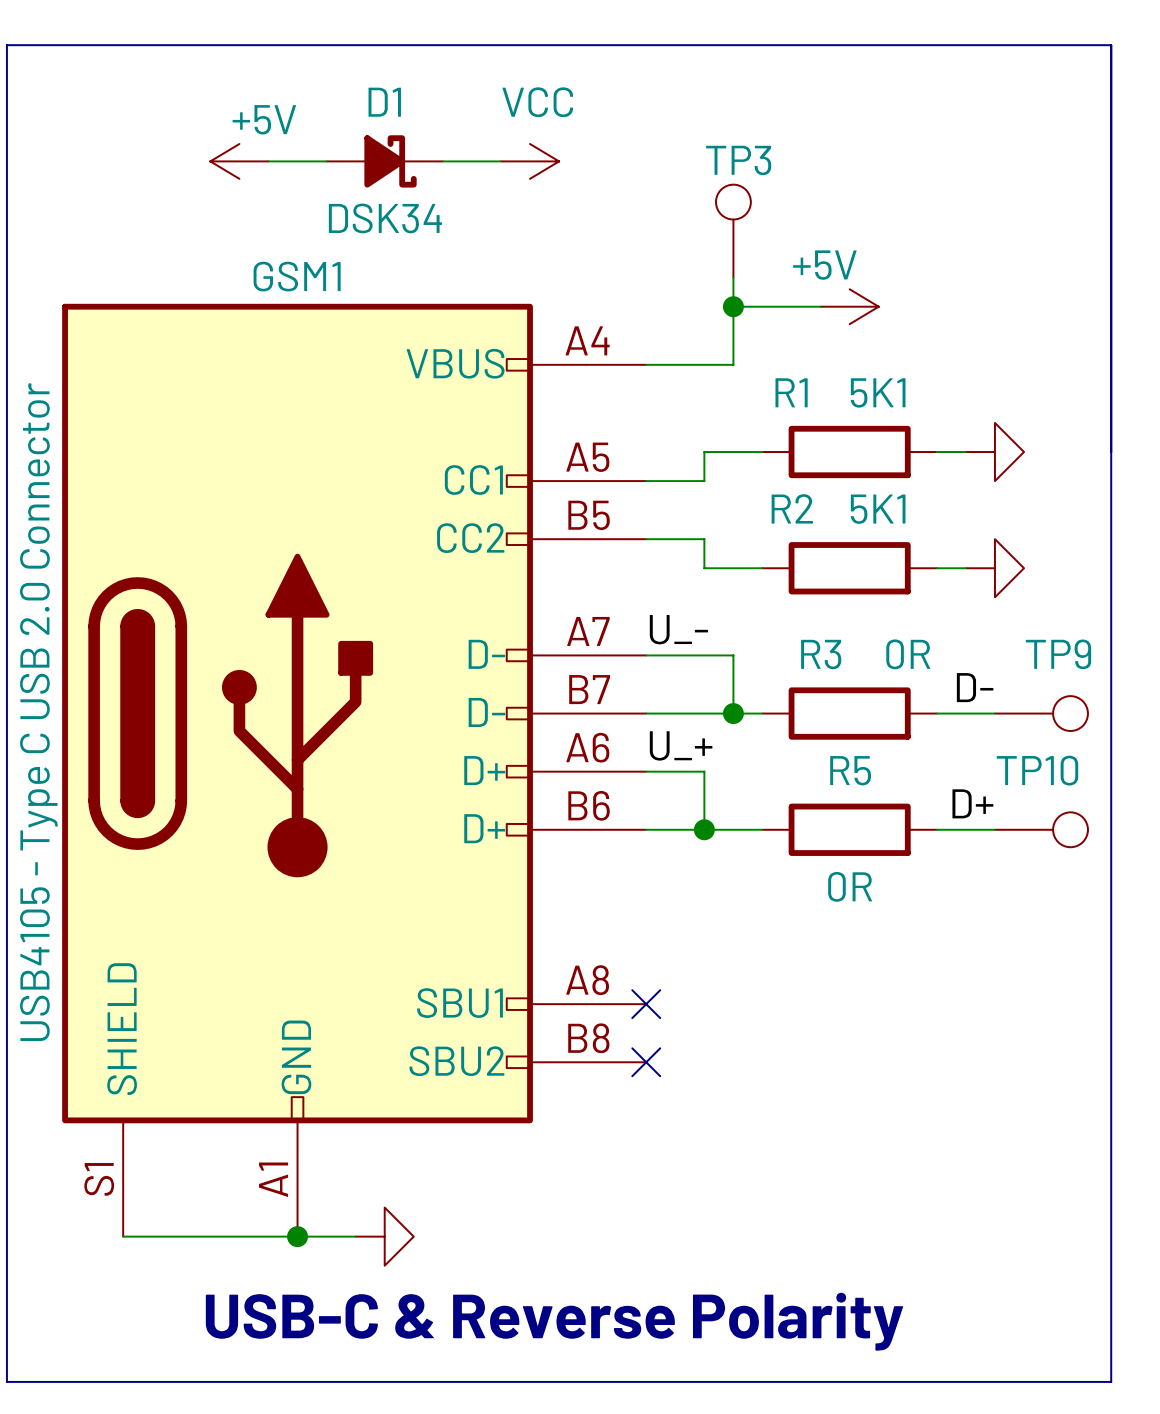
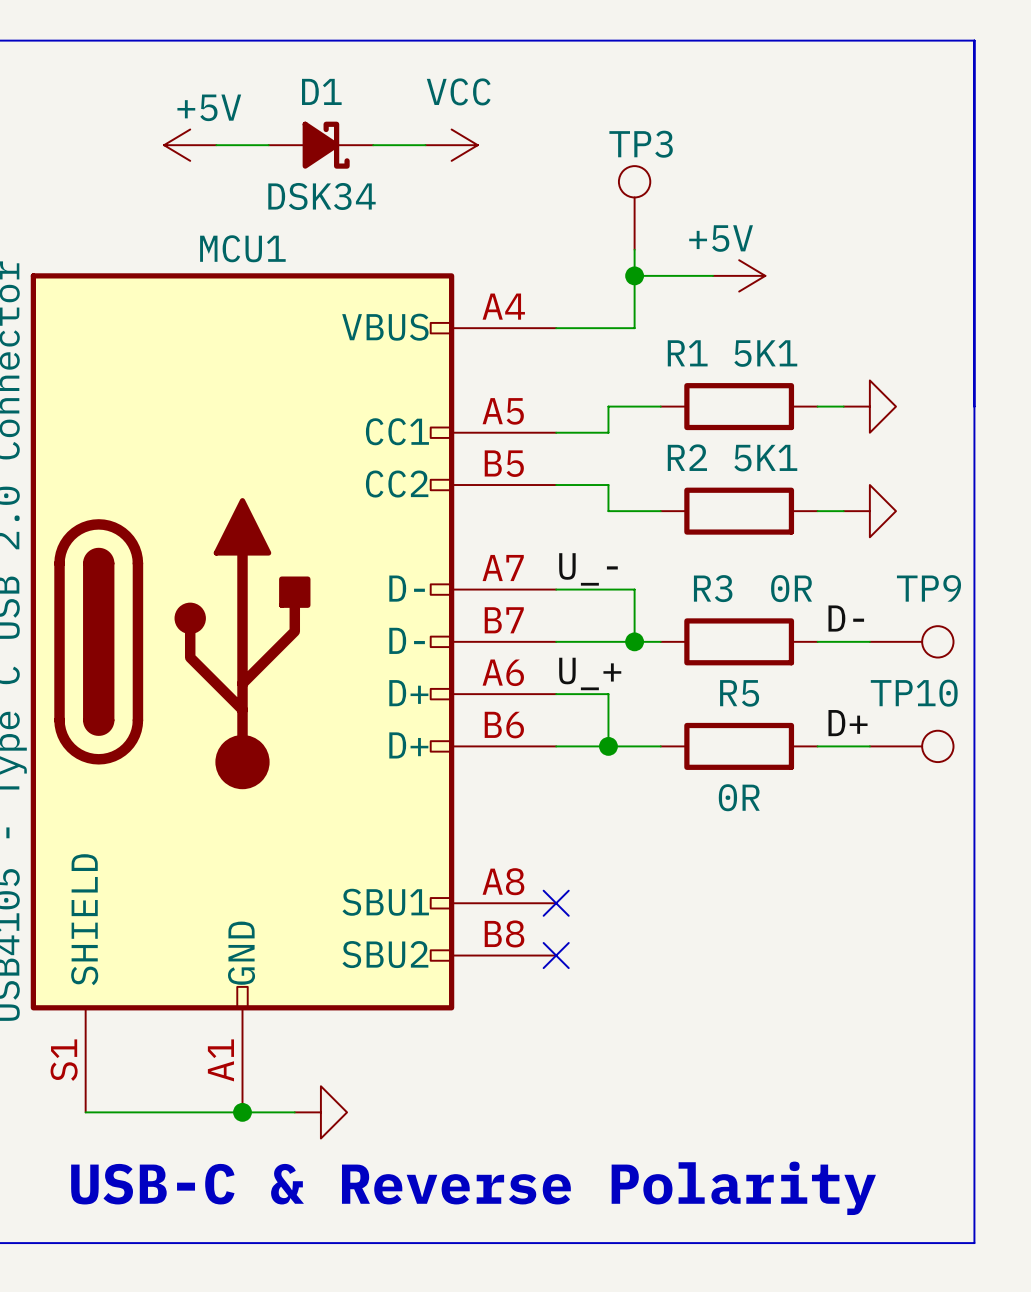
GSM1 name: GSM1 (297, 276) -> MCU1 (242, 248)

